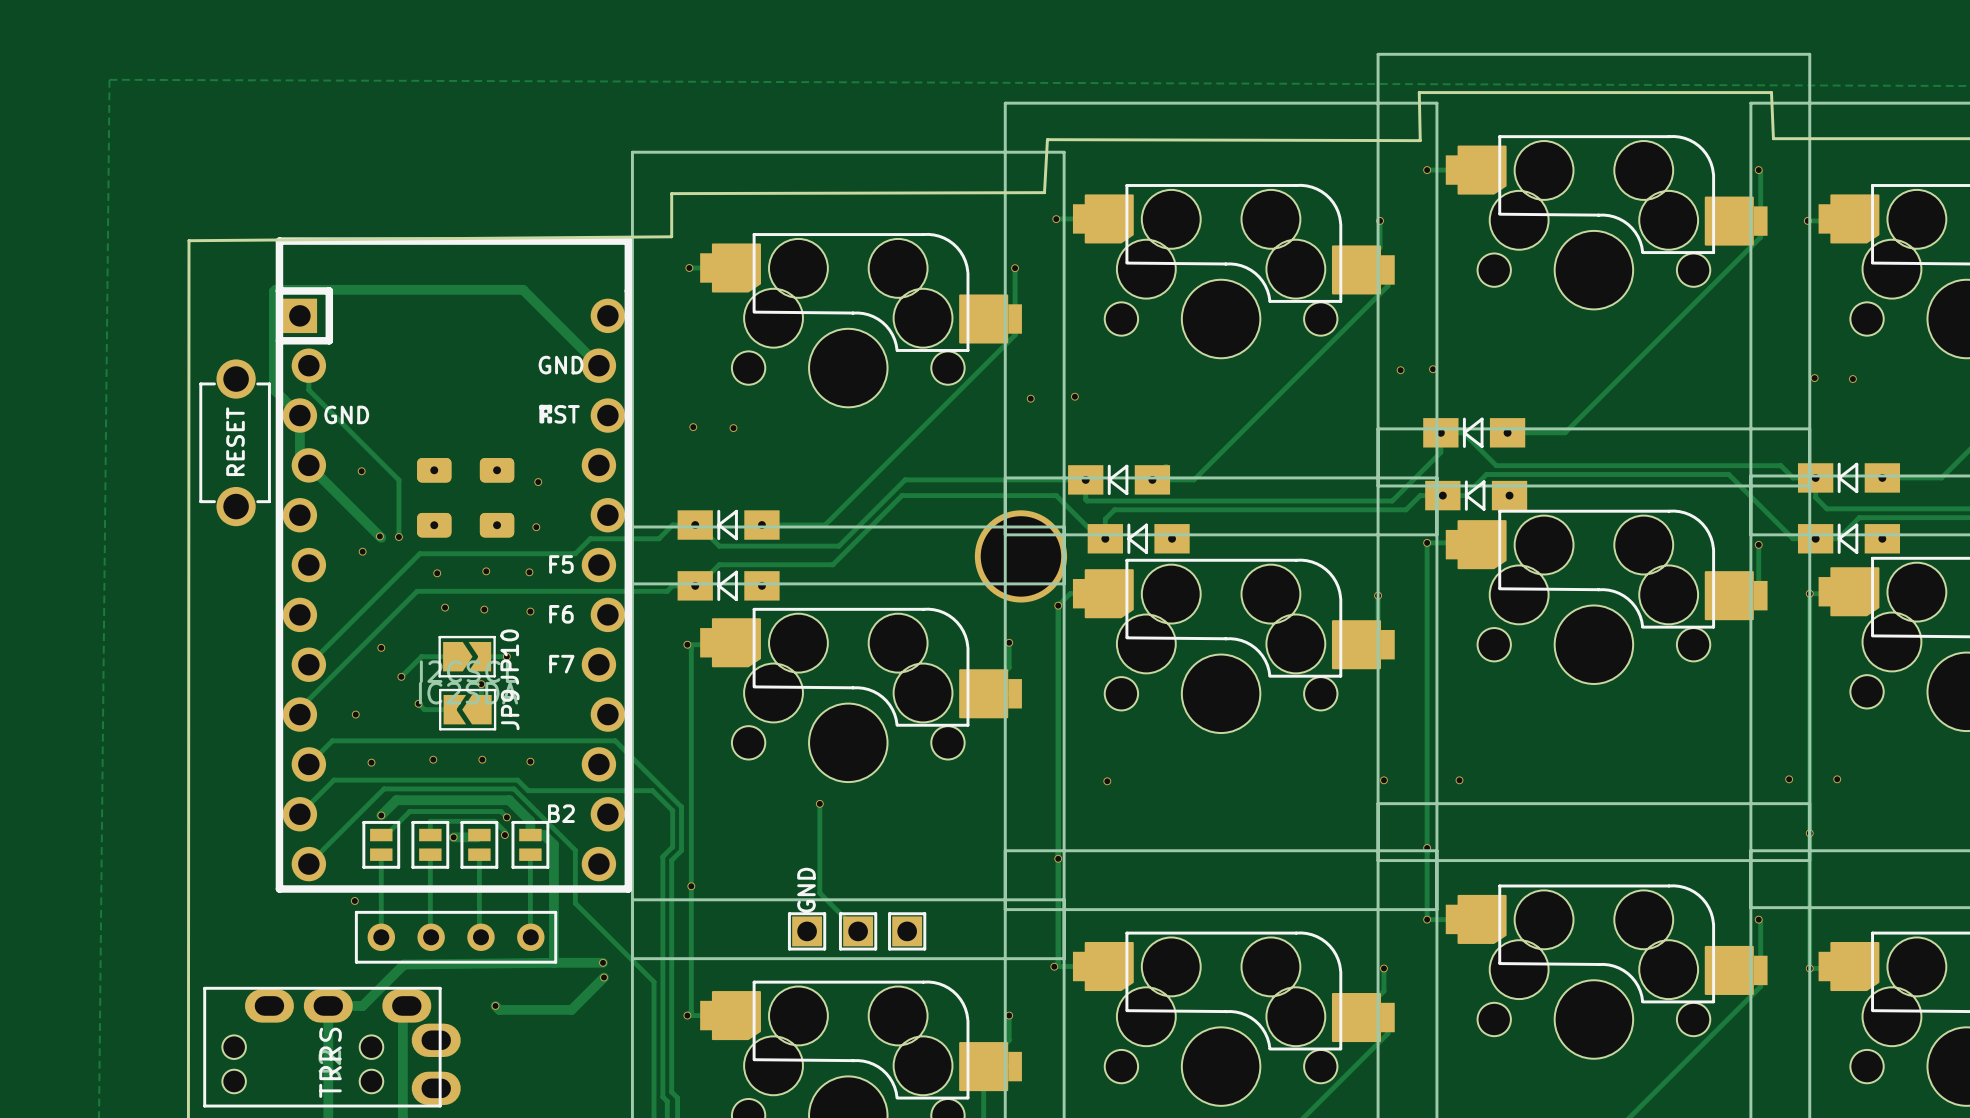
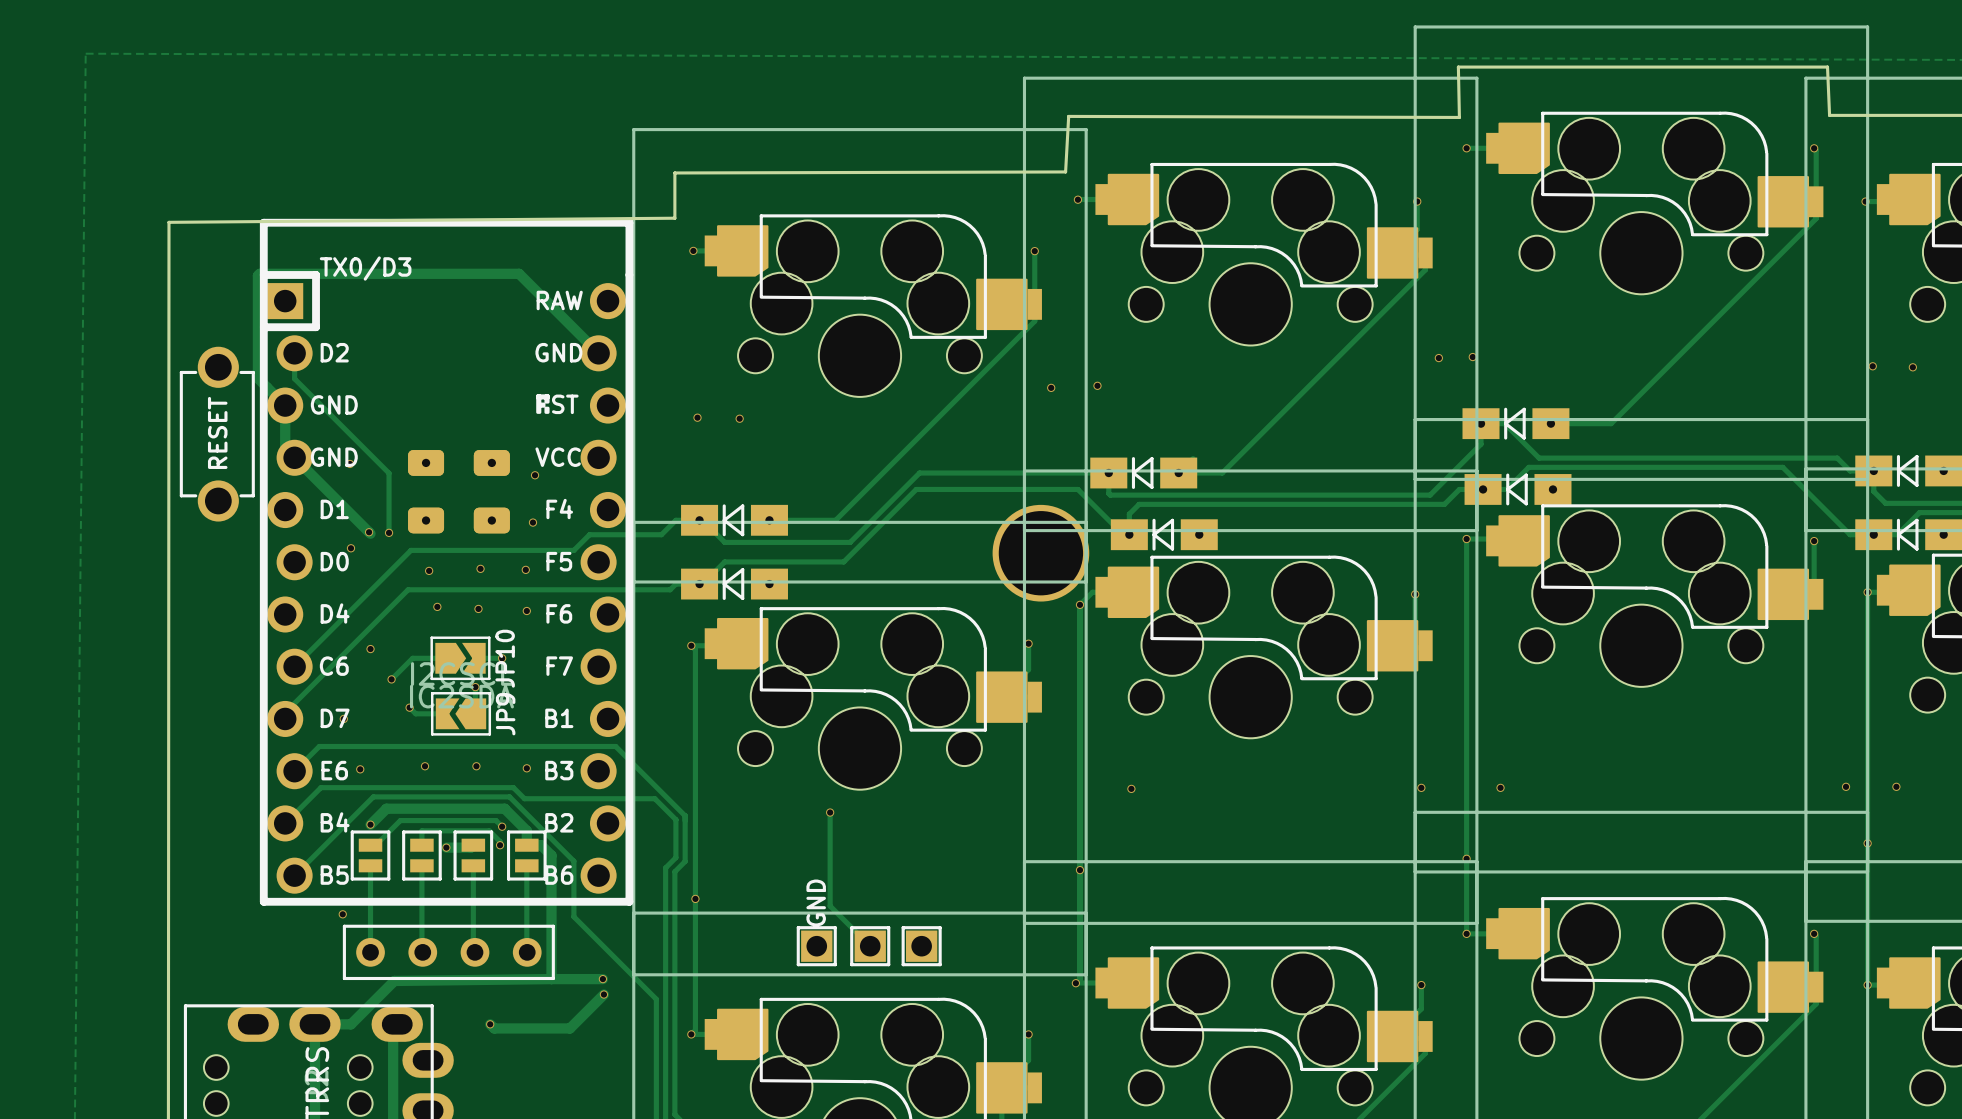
part footprint: [275, 237, 633, 893] -> [259, 218, 634, 906]

